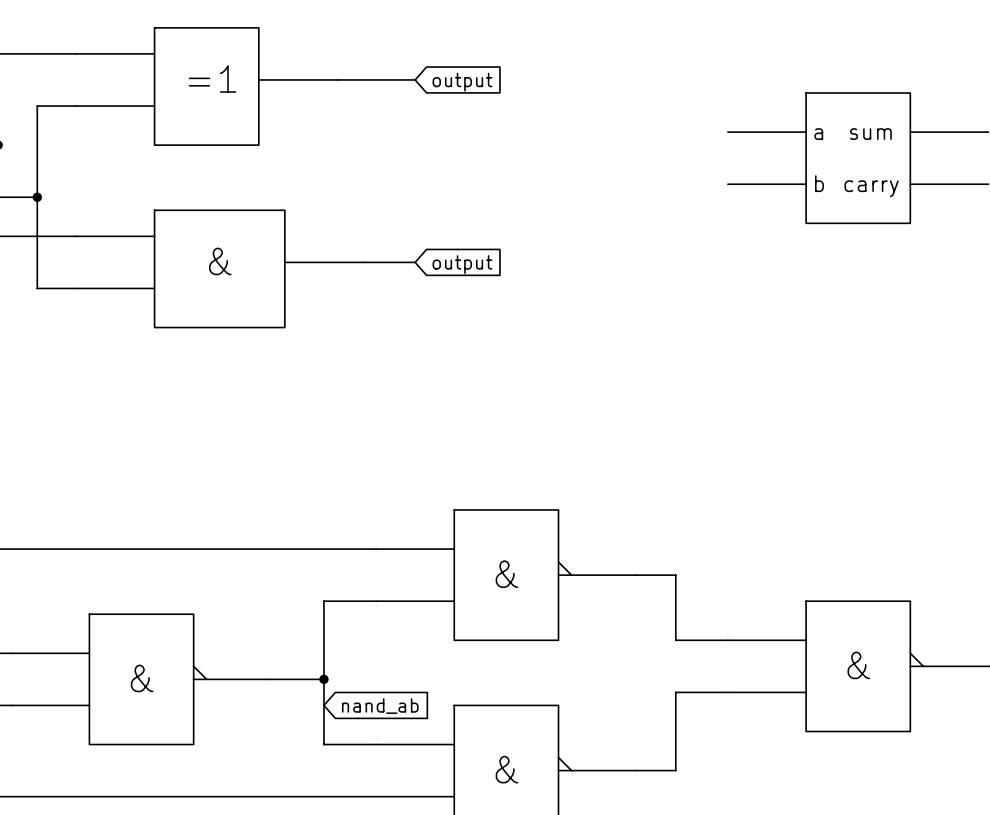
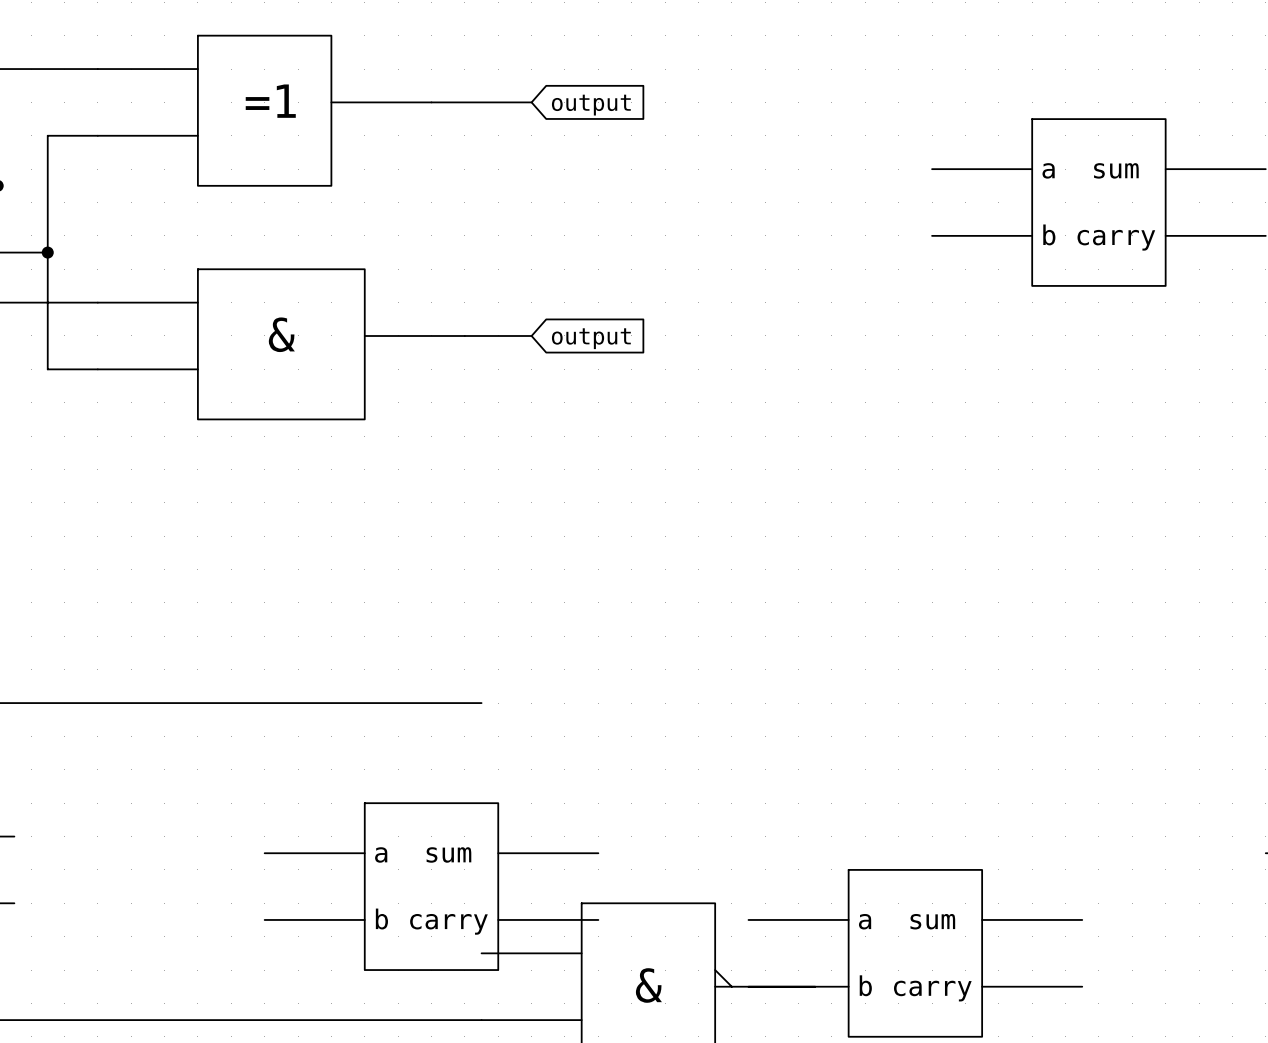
part: (506, 575) -> none
wire: (636, 575) (675, 575) (675, 640) (727, 640) -> none
wire: (376, 601) (323, 601) (323, 744) (376, 744) -> none
part: (858, 666) -> none
part: (141, 679) -> none
wire: (271, 679) (323, 679) -> none
junction: (323, 679) -> none
part: none -> (431, 886)
wire: (727, 692) (675, 692) (675, 770) (636, 770) -> none
global label: nand_ab (380, 706) -> none
part: none -> (915, 953)

